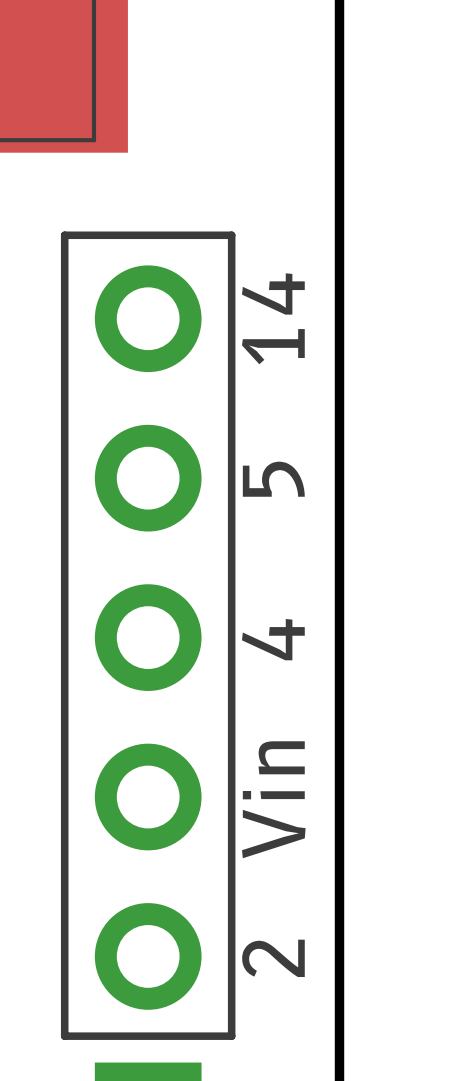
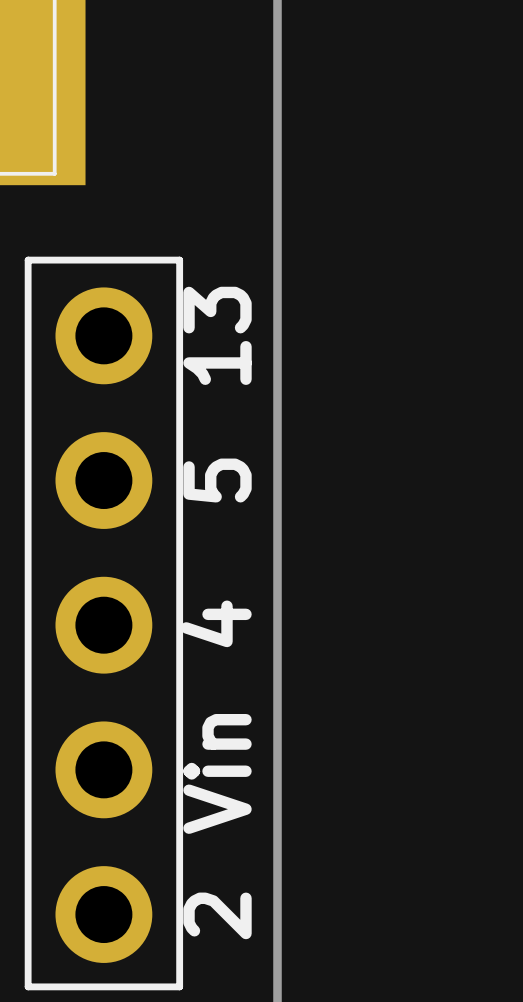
text: 14 (273, 318) -> 13 (217, 335)

